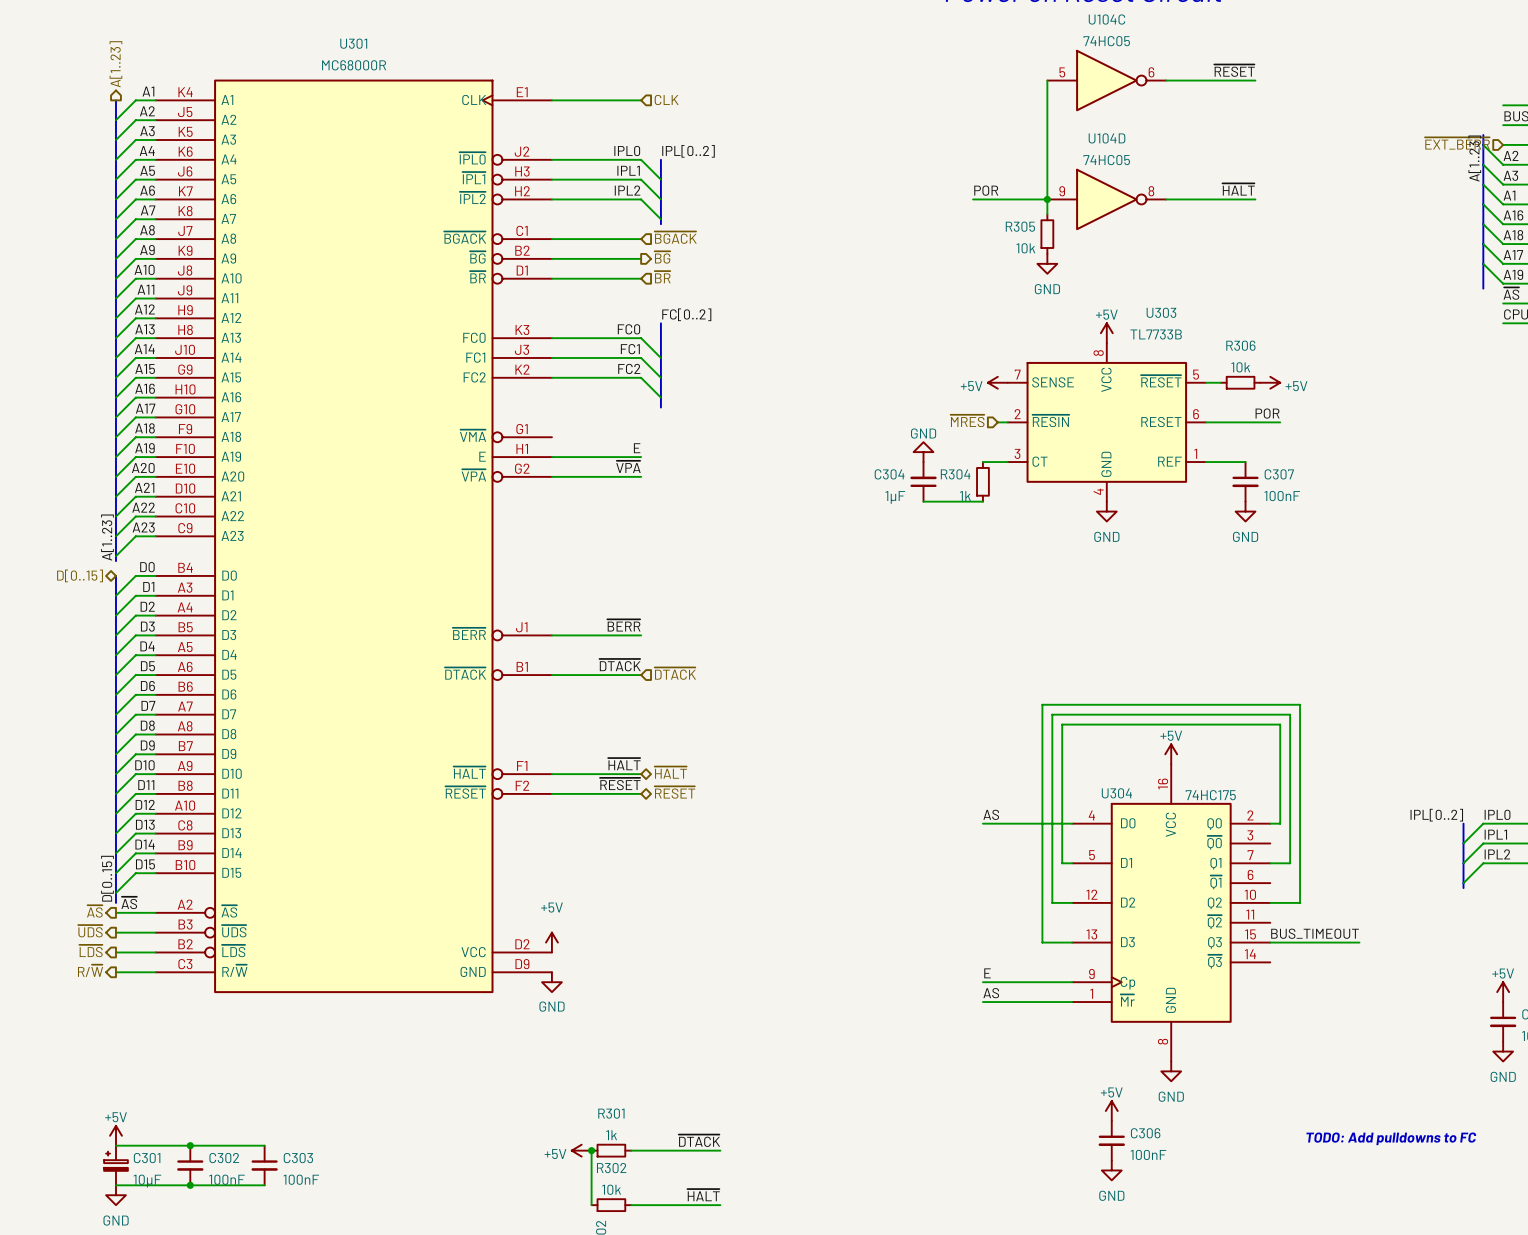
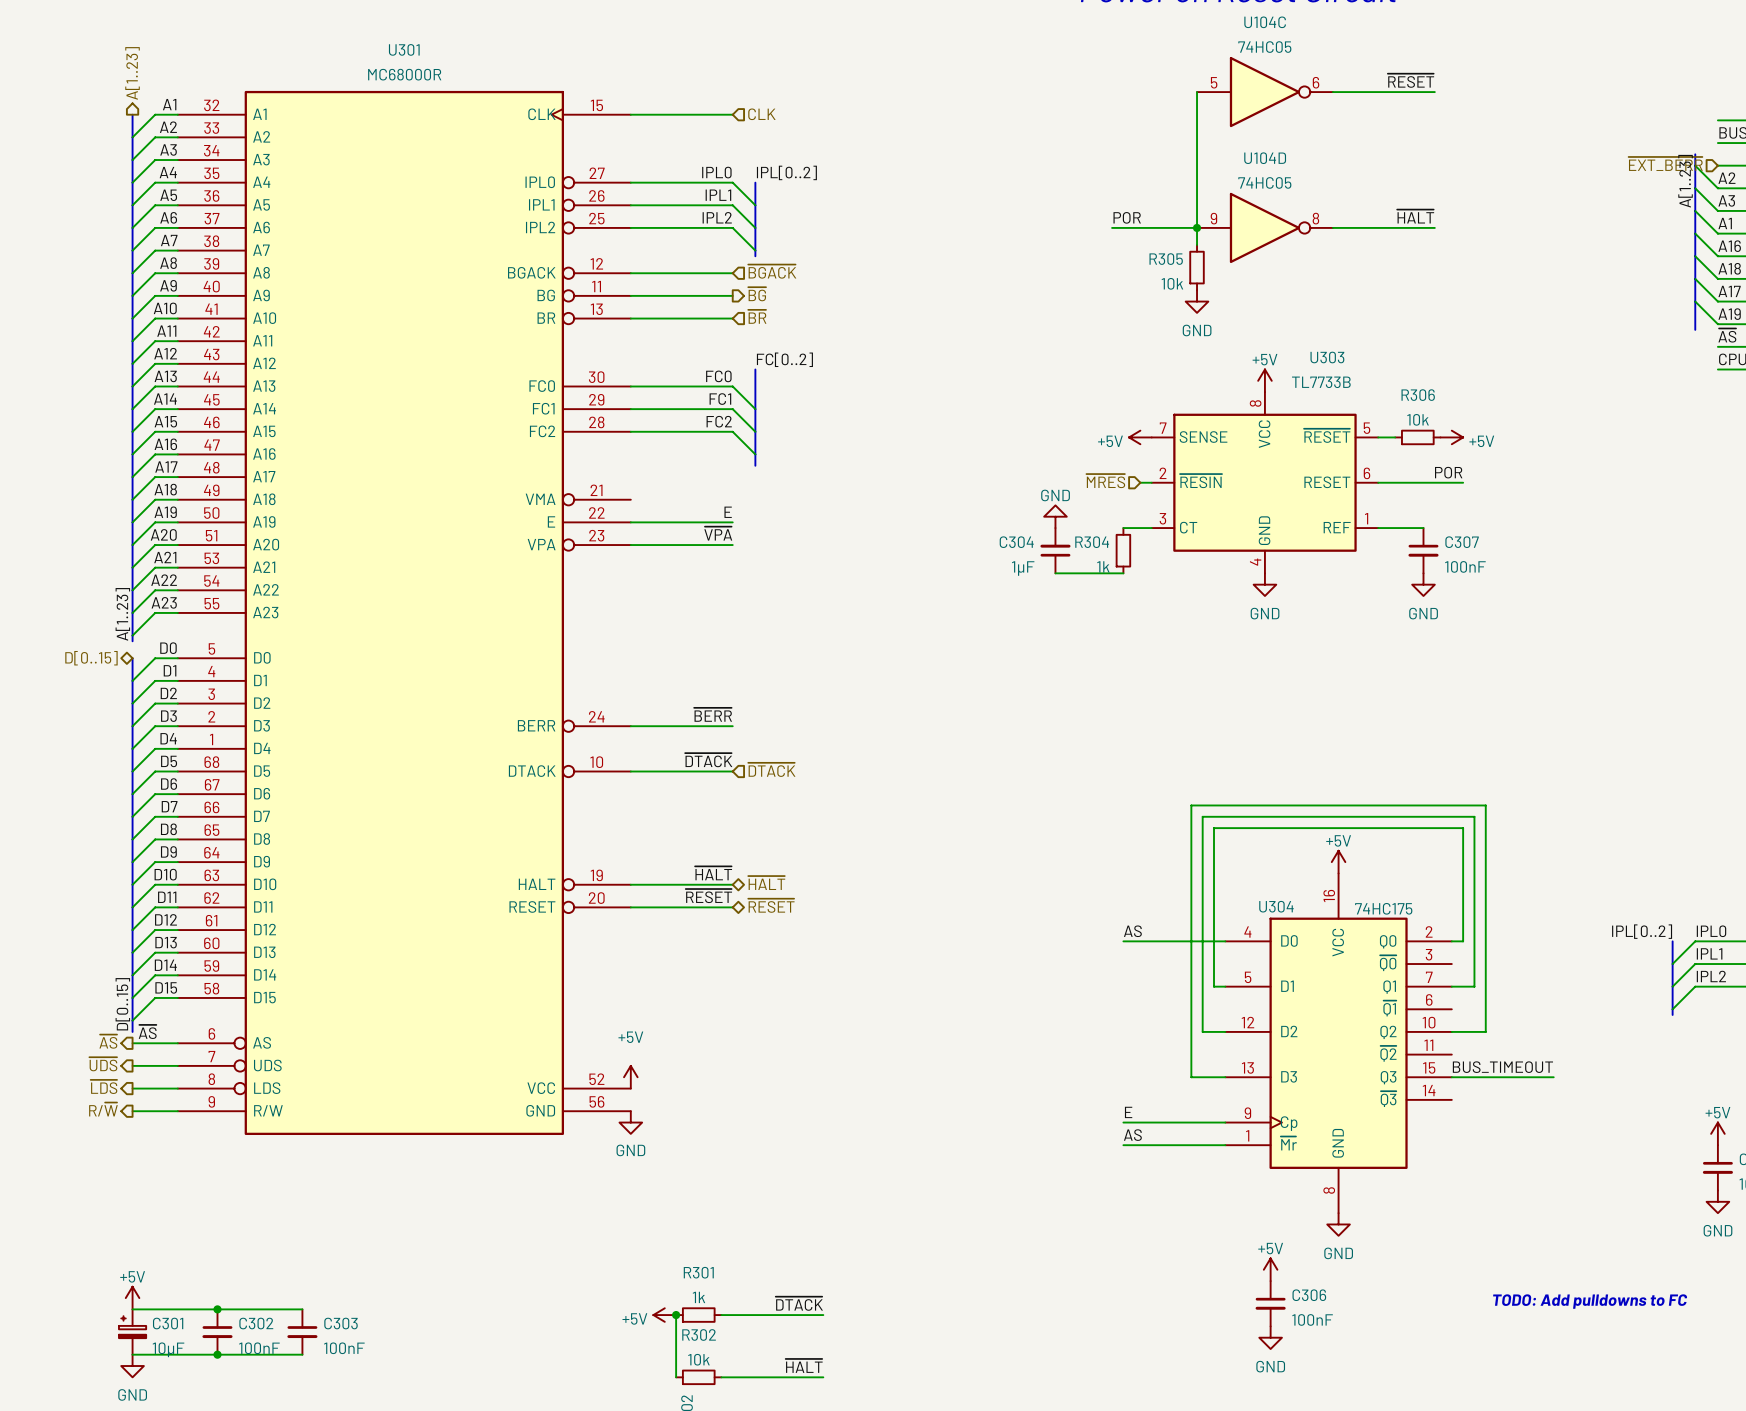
U301 symbol: [155, 79, 552, 994] -> [177, 90, 631, 1136]

